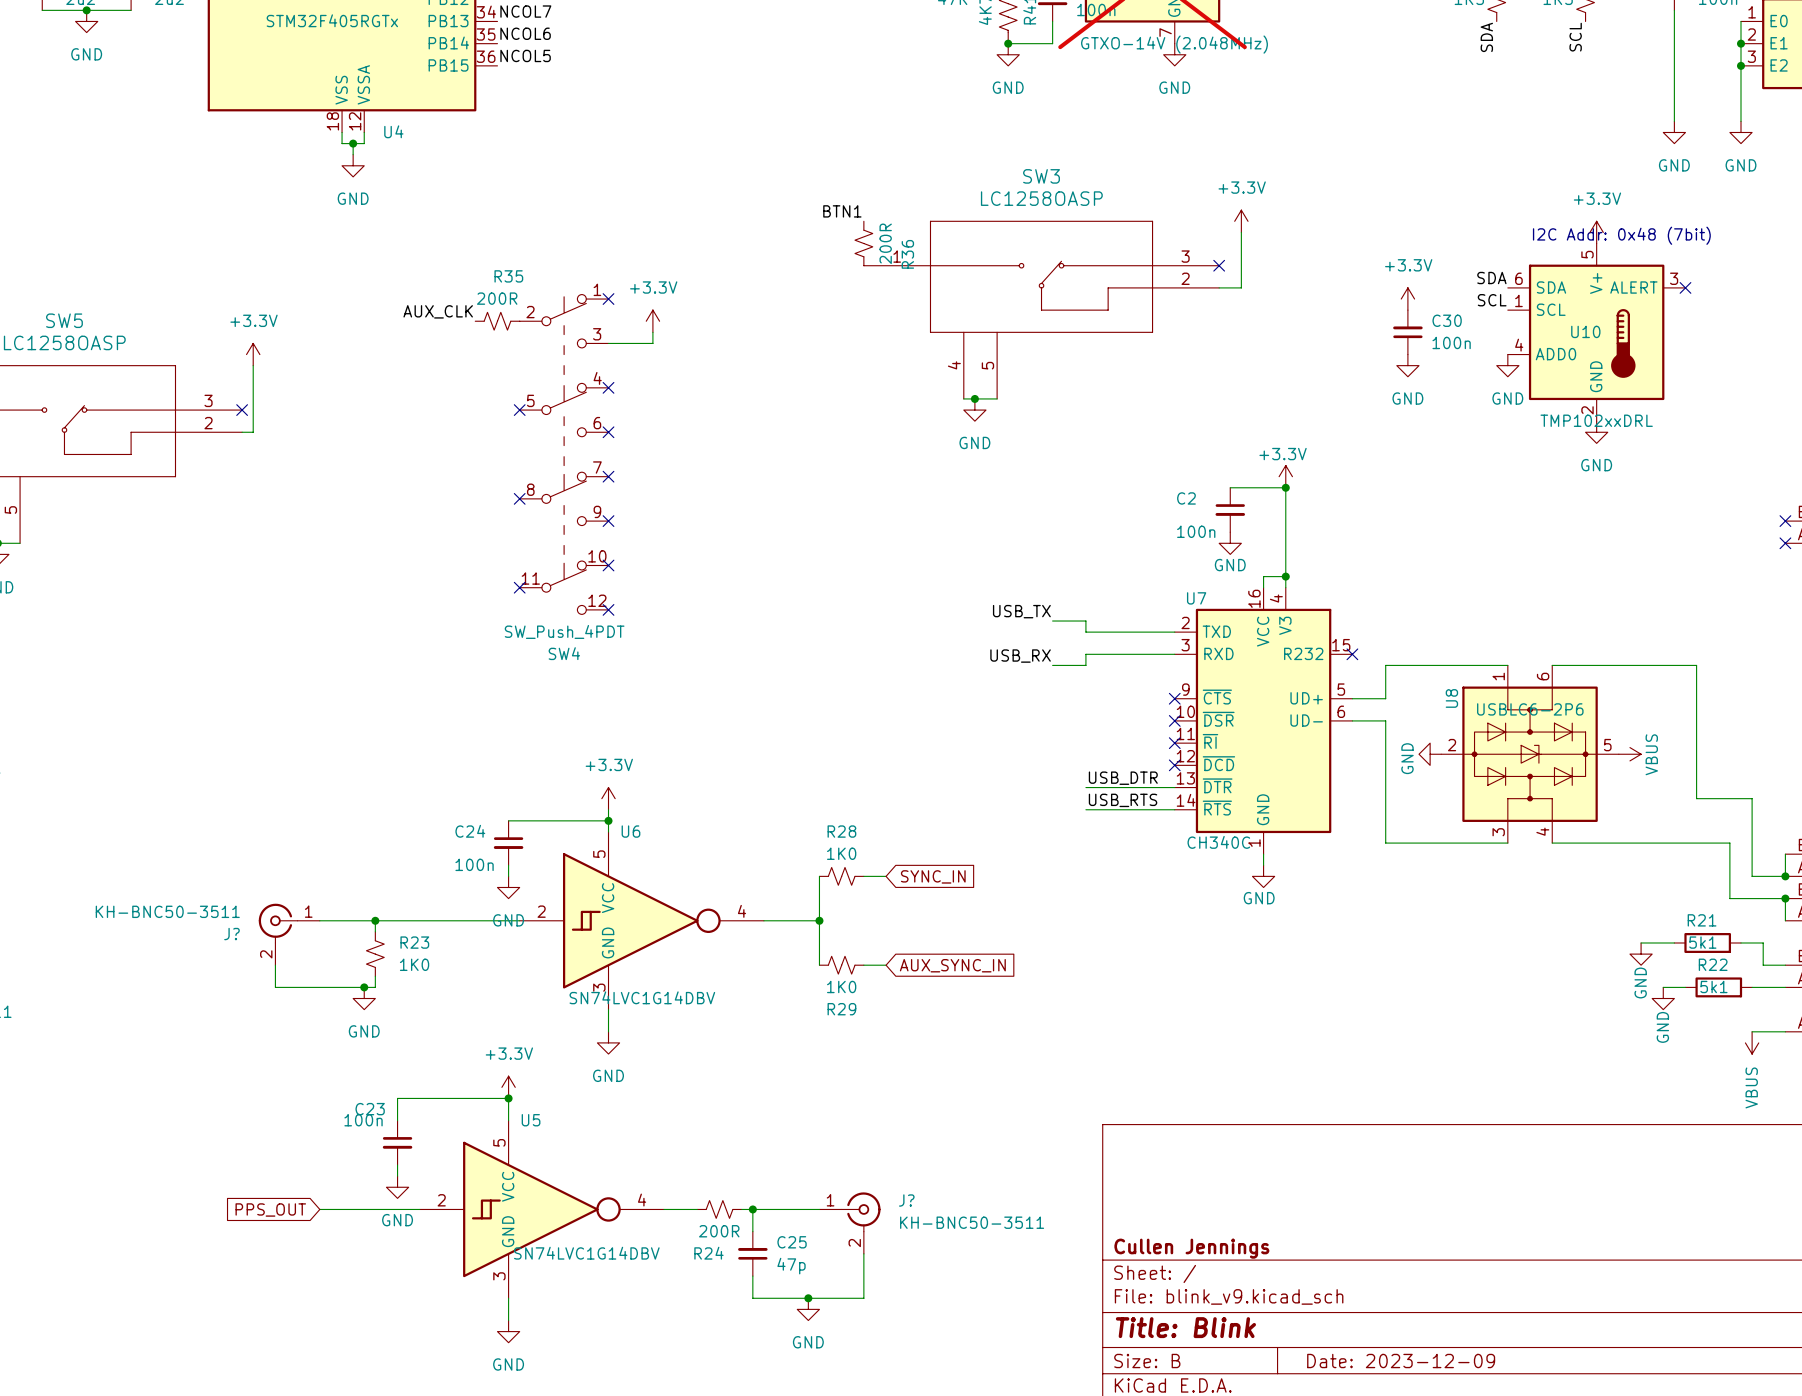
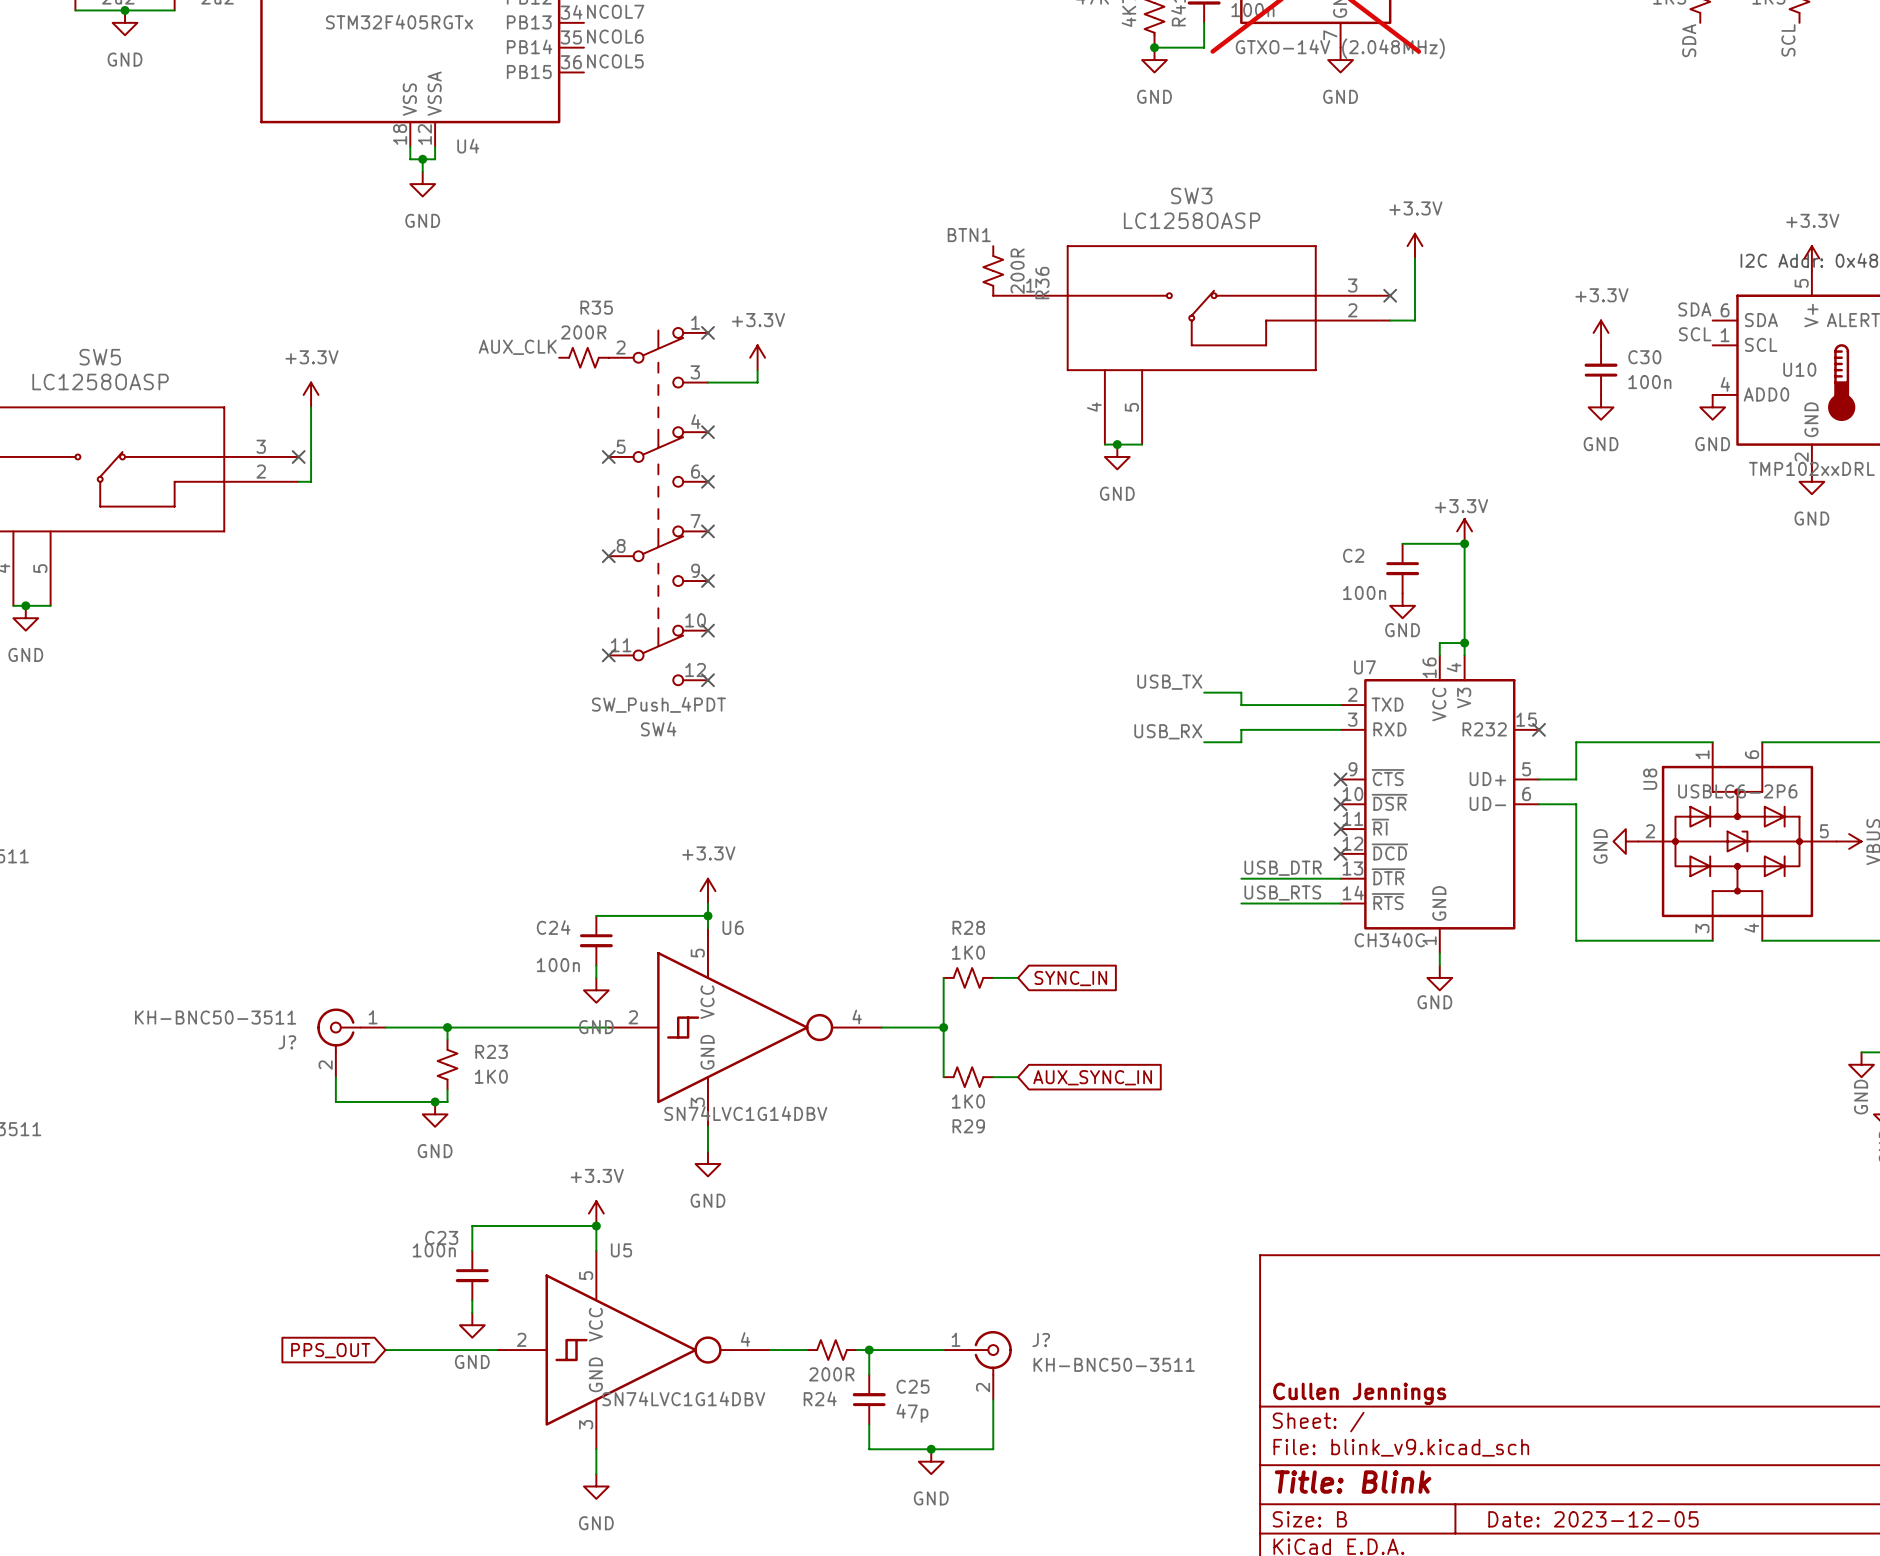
title block: Date: 2023-12-09 (1401, 1361) -> Date: 2023-12-05 (1593, 1519)

